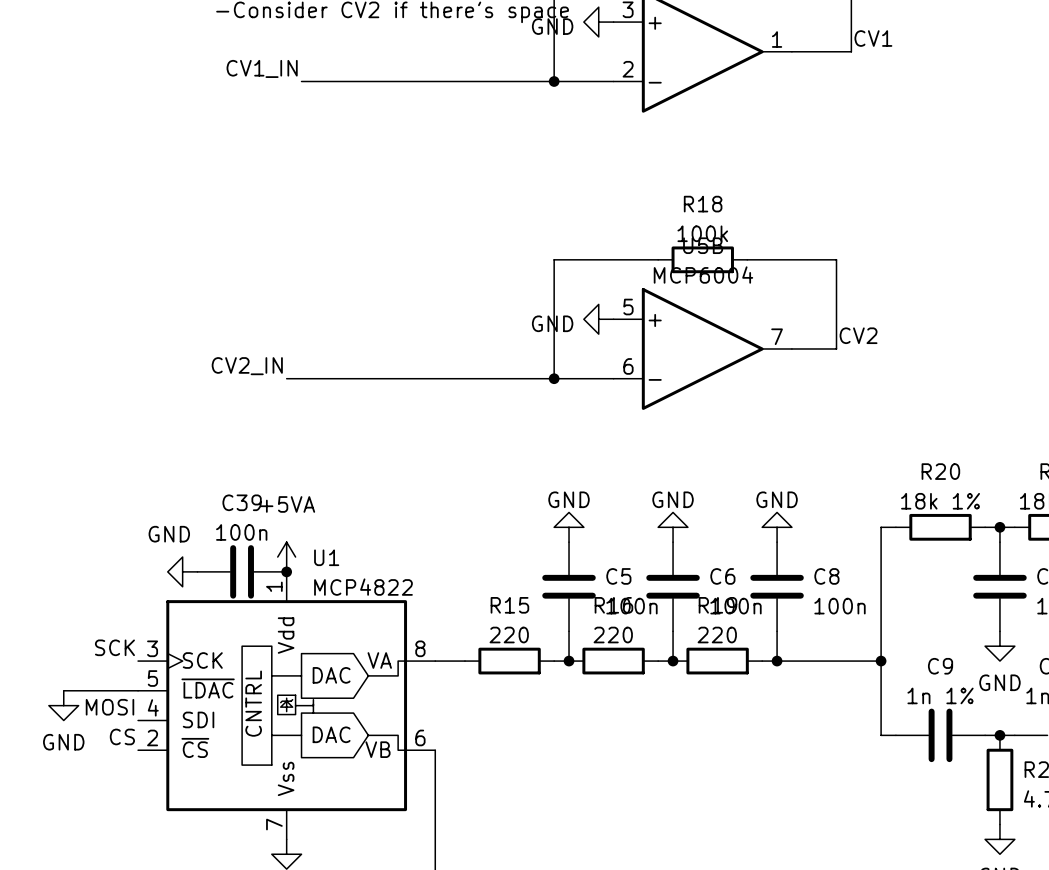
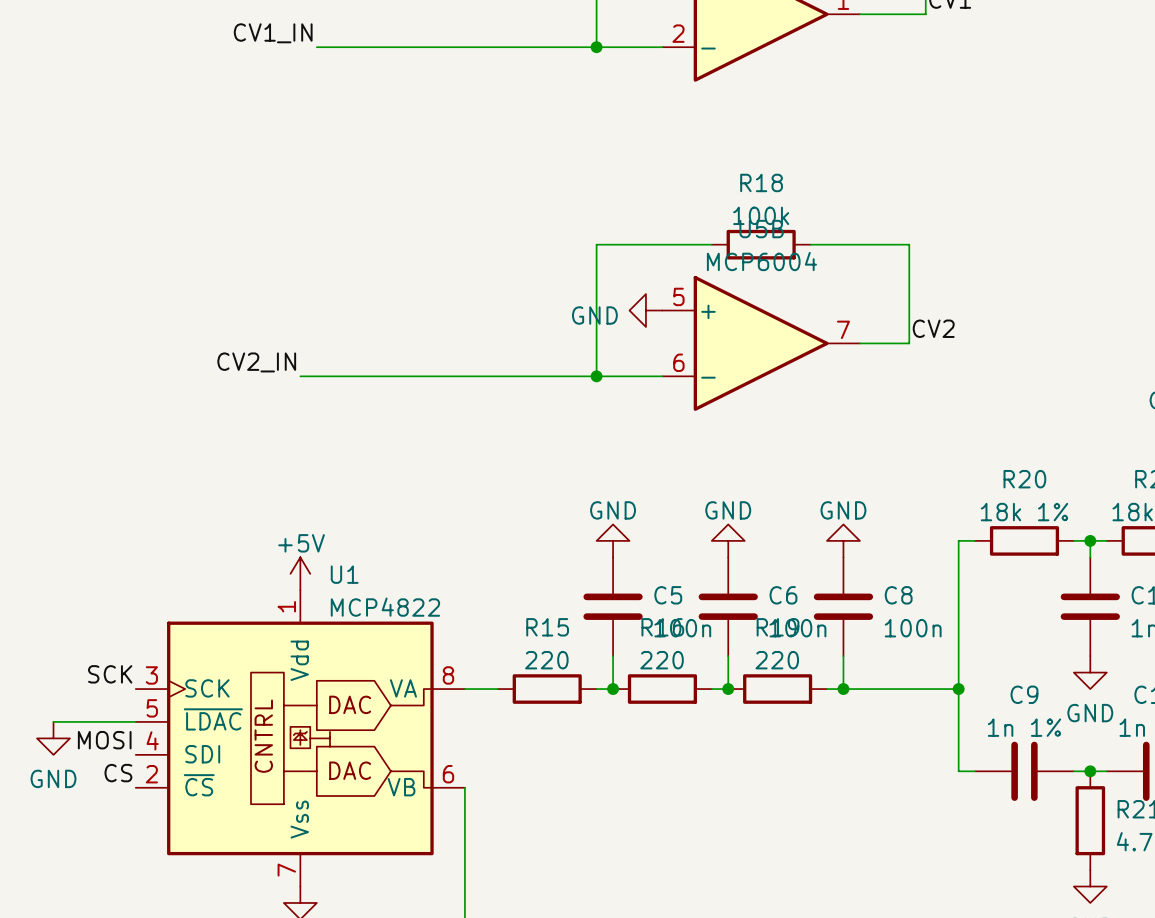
power symbol: +5VA (286, 557) -> +5V (300, 573)
power symbol: GND (182, 571) -> none
C39: 100n (242, 571) -> none
junction: (286, 571) -> none

